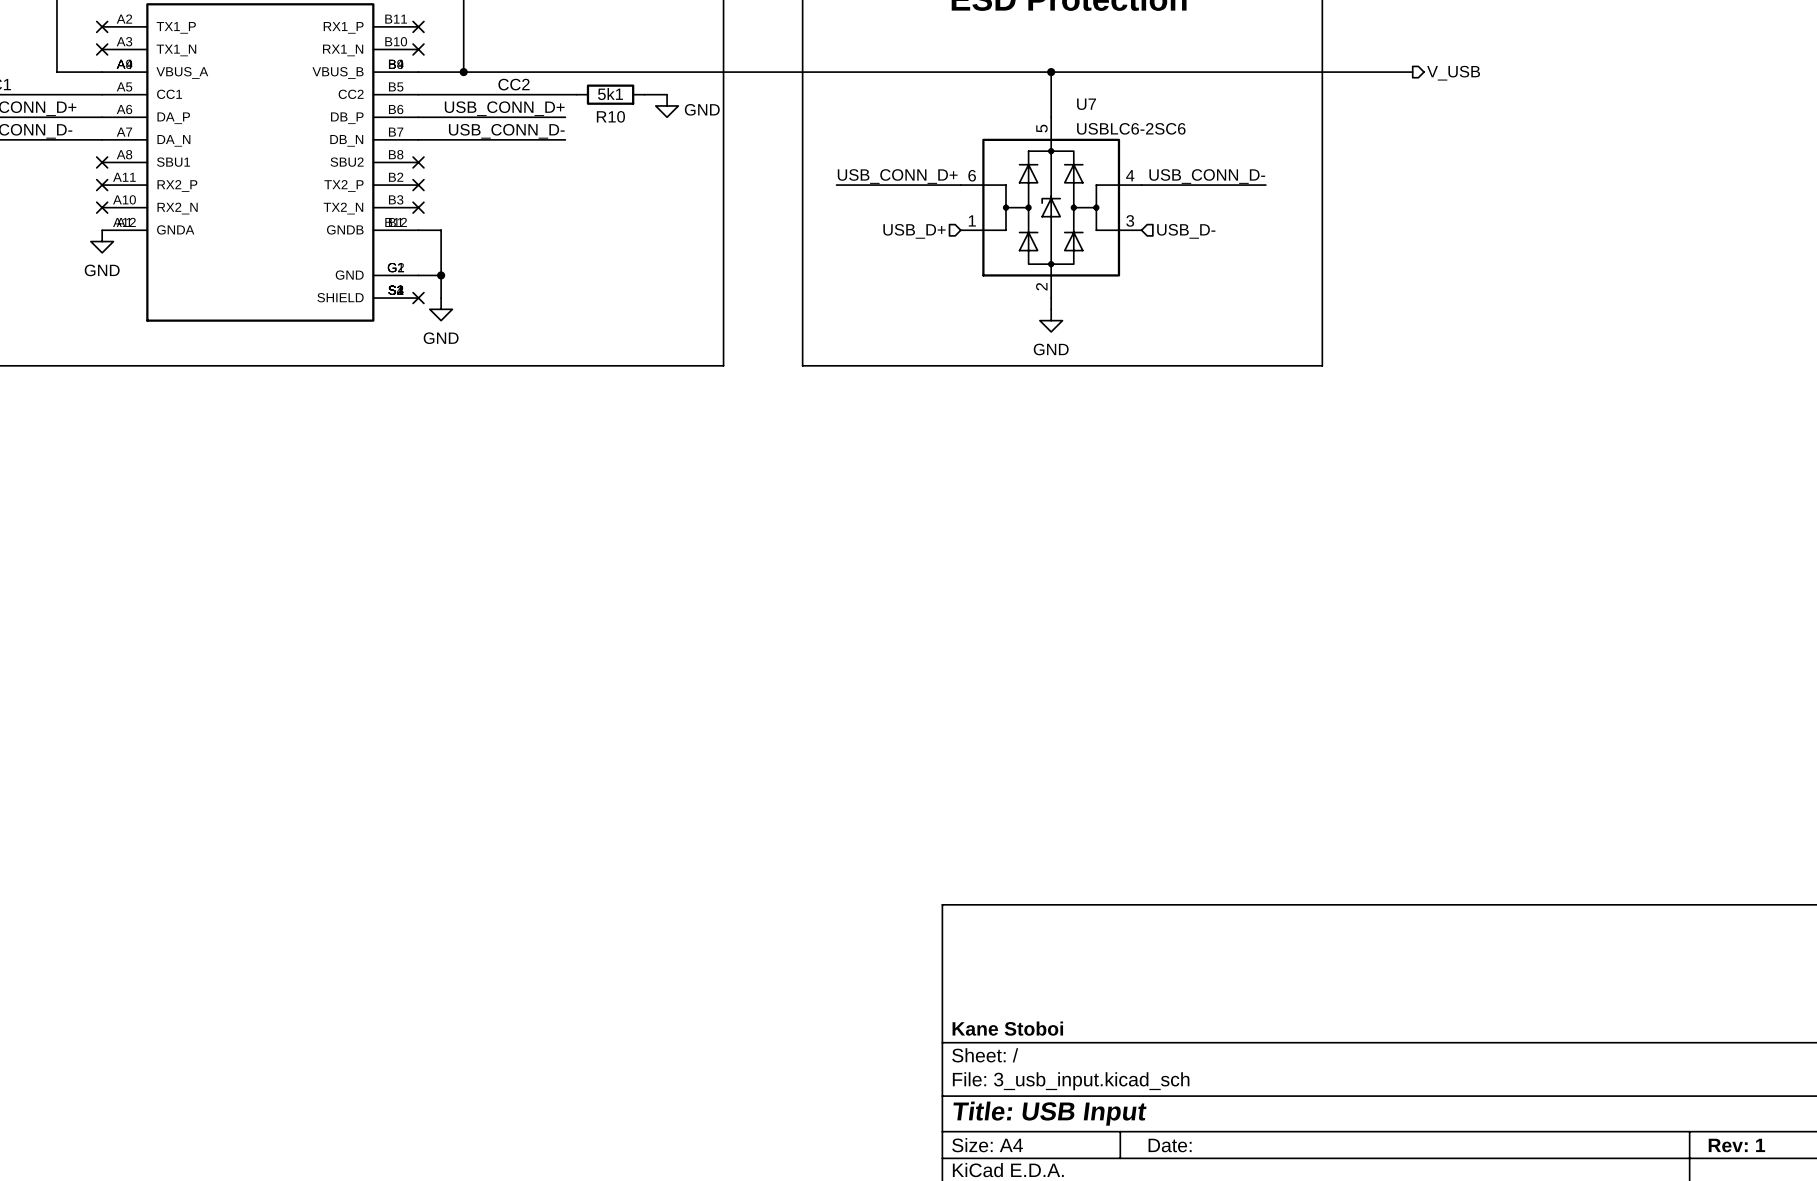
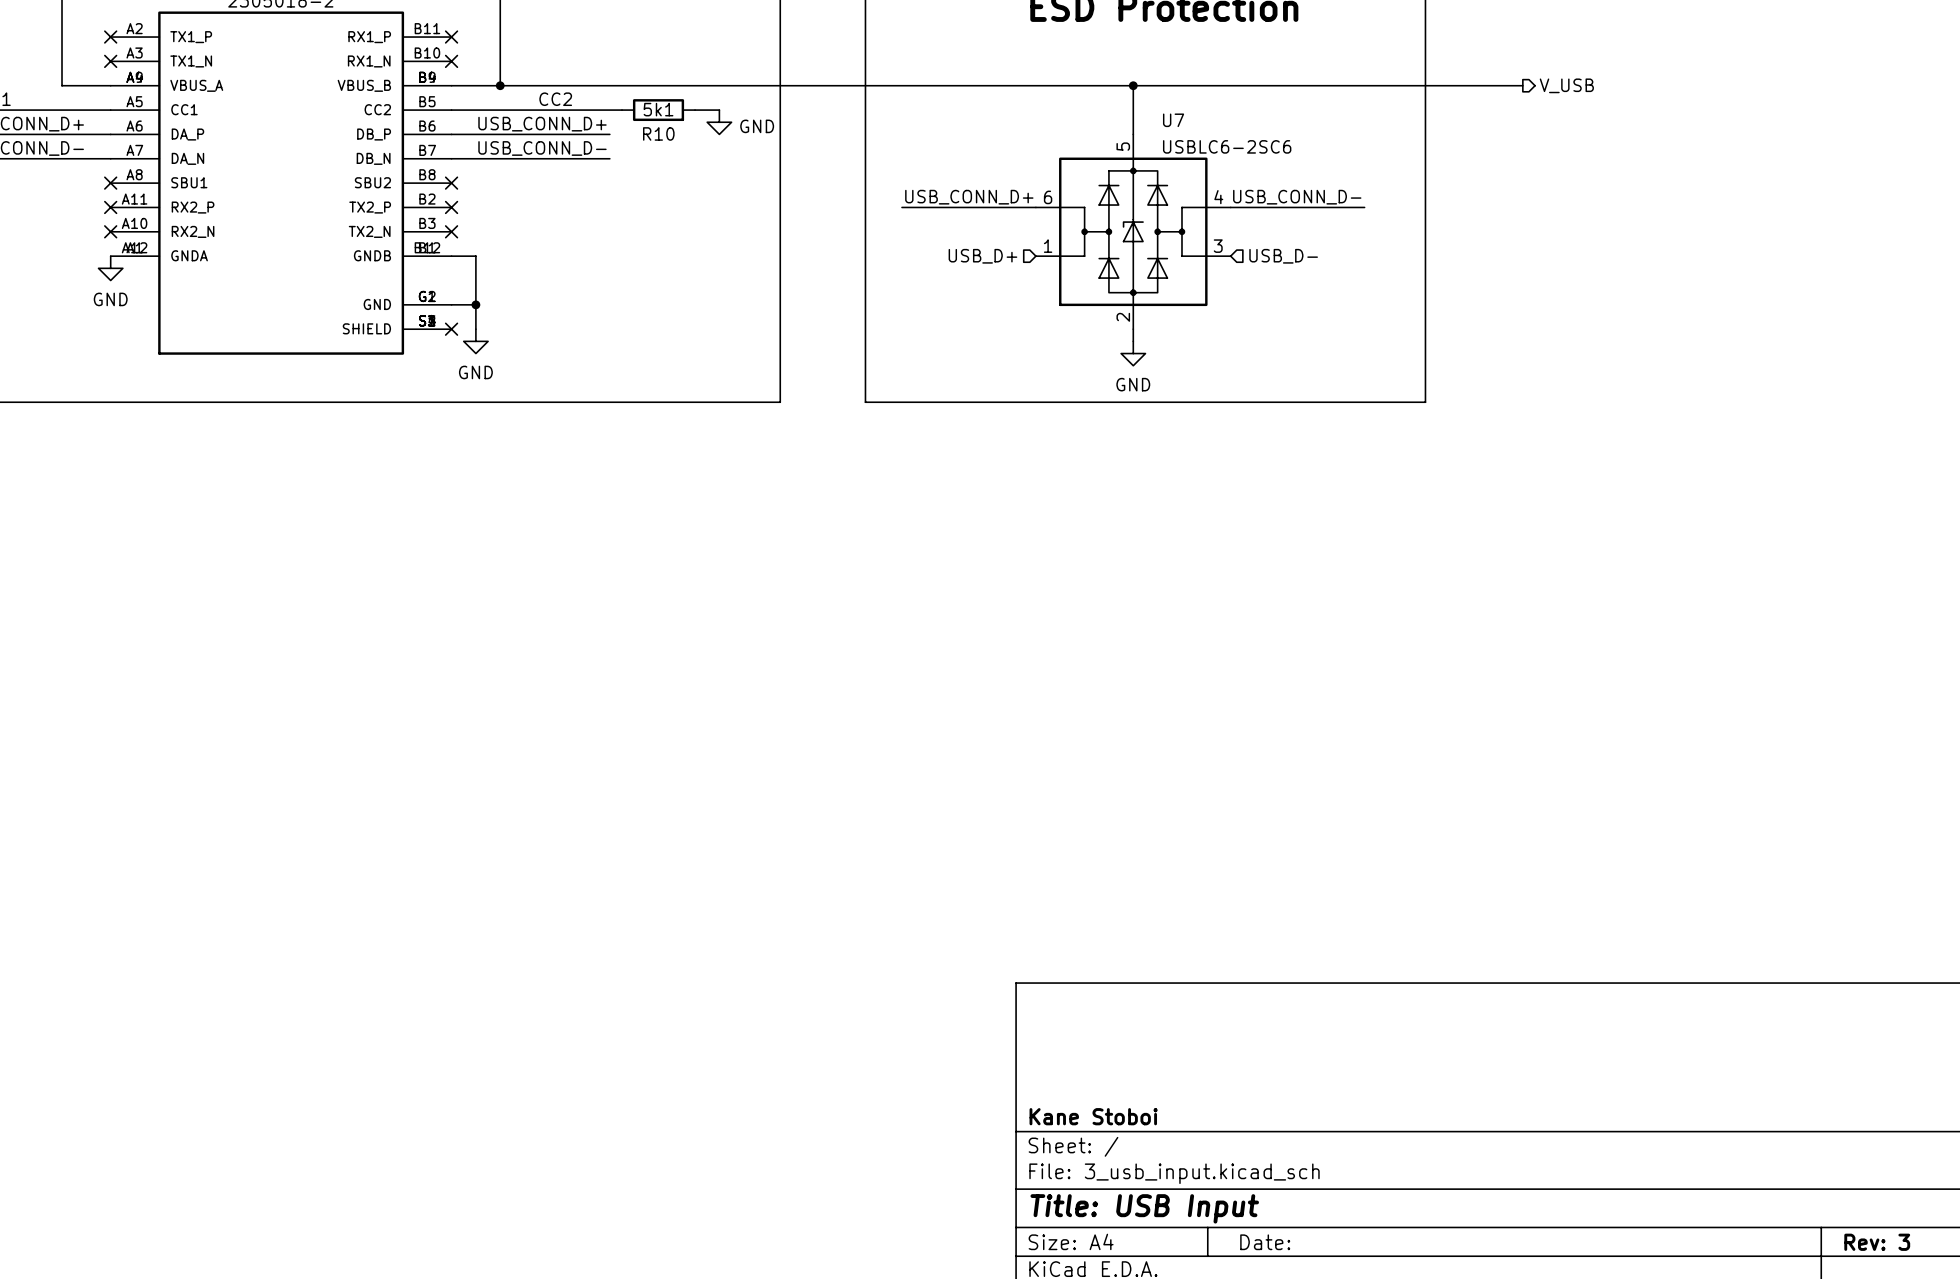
title block: Rev: 1 (1736, 1145) -> Rev: 3 (1877, 1242)

